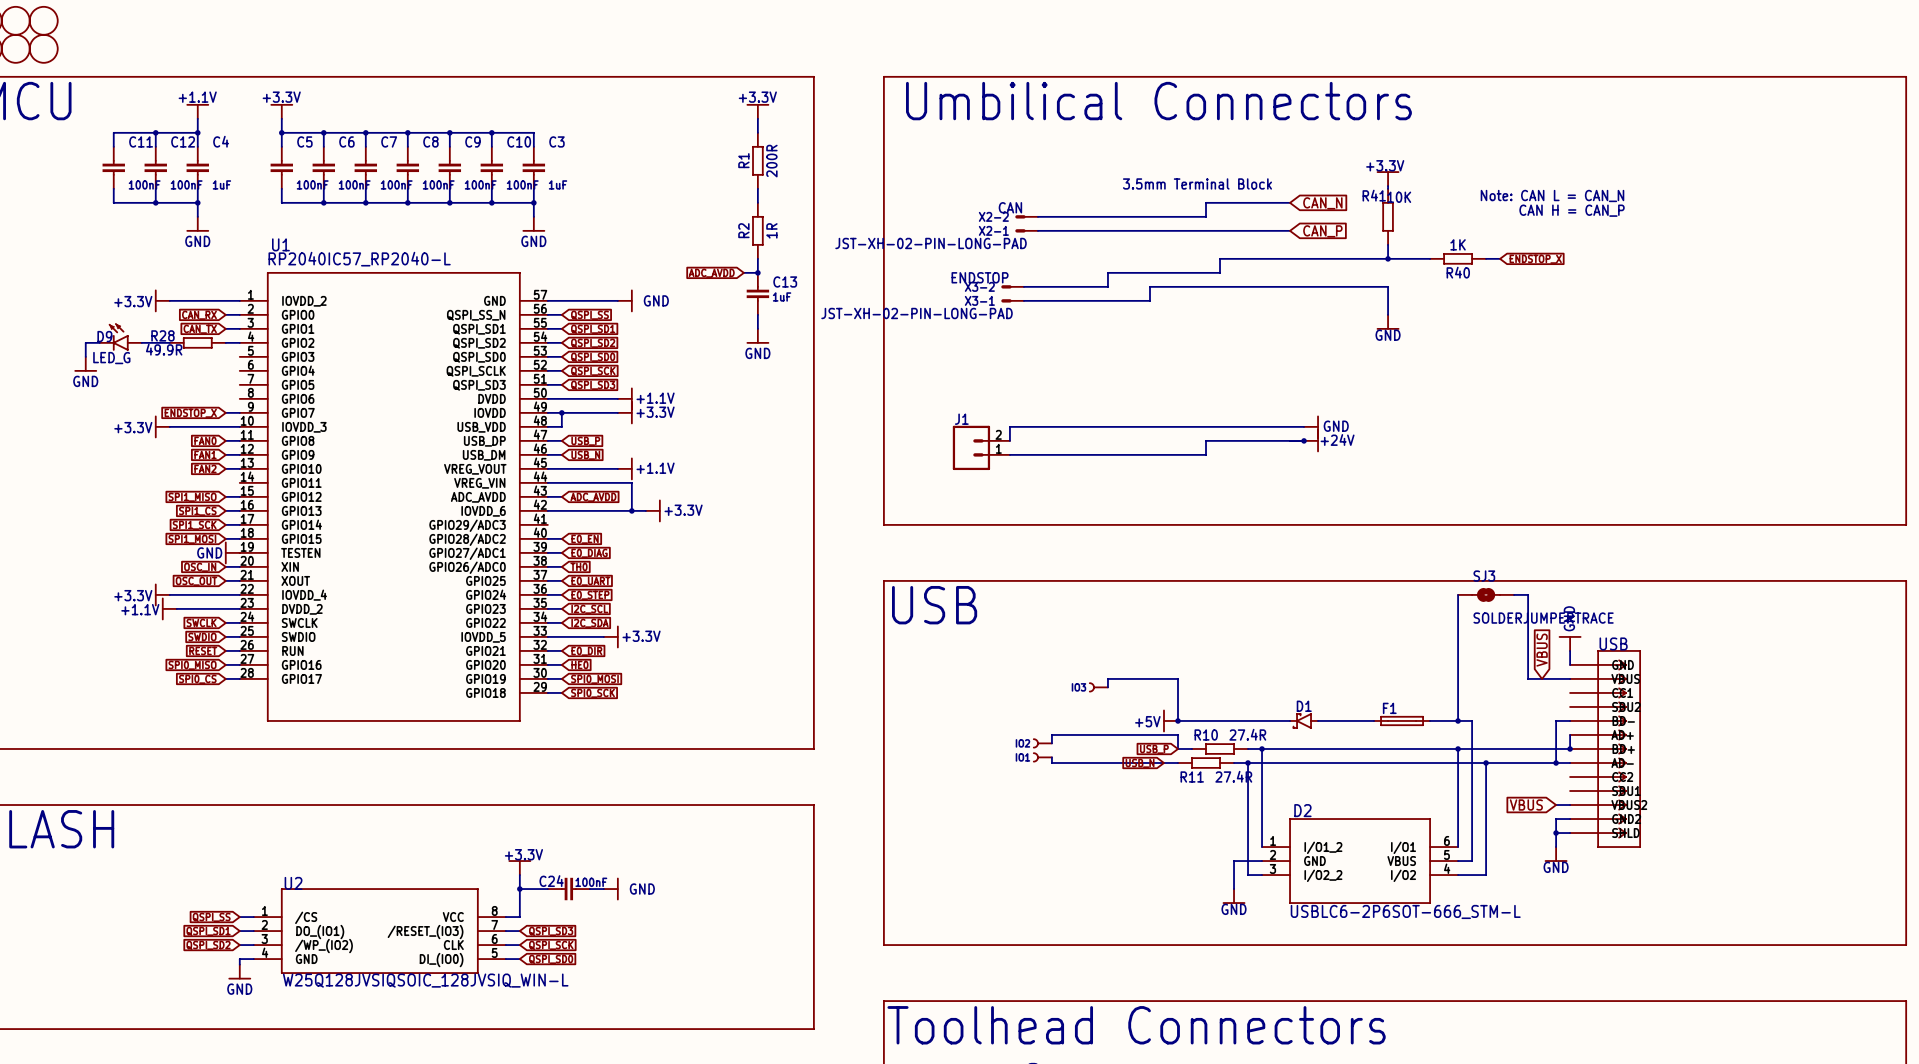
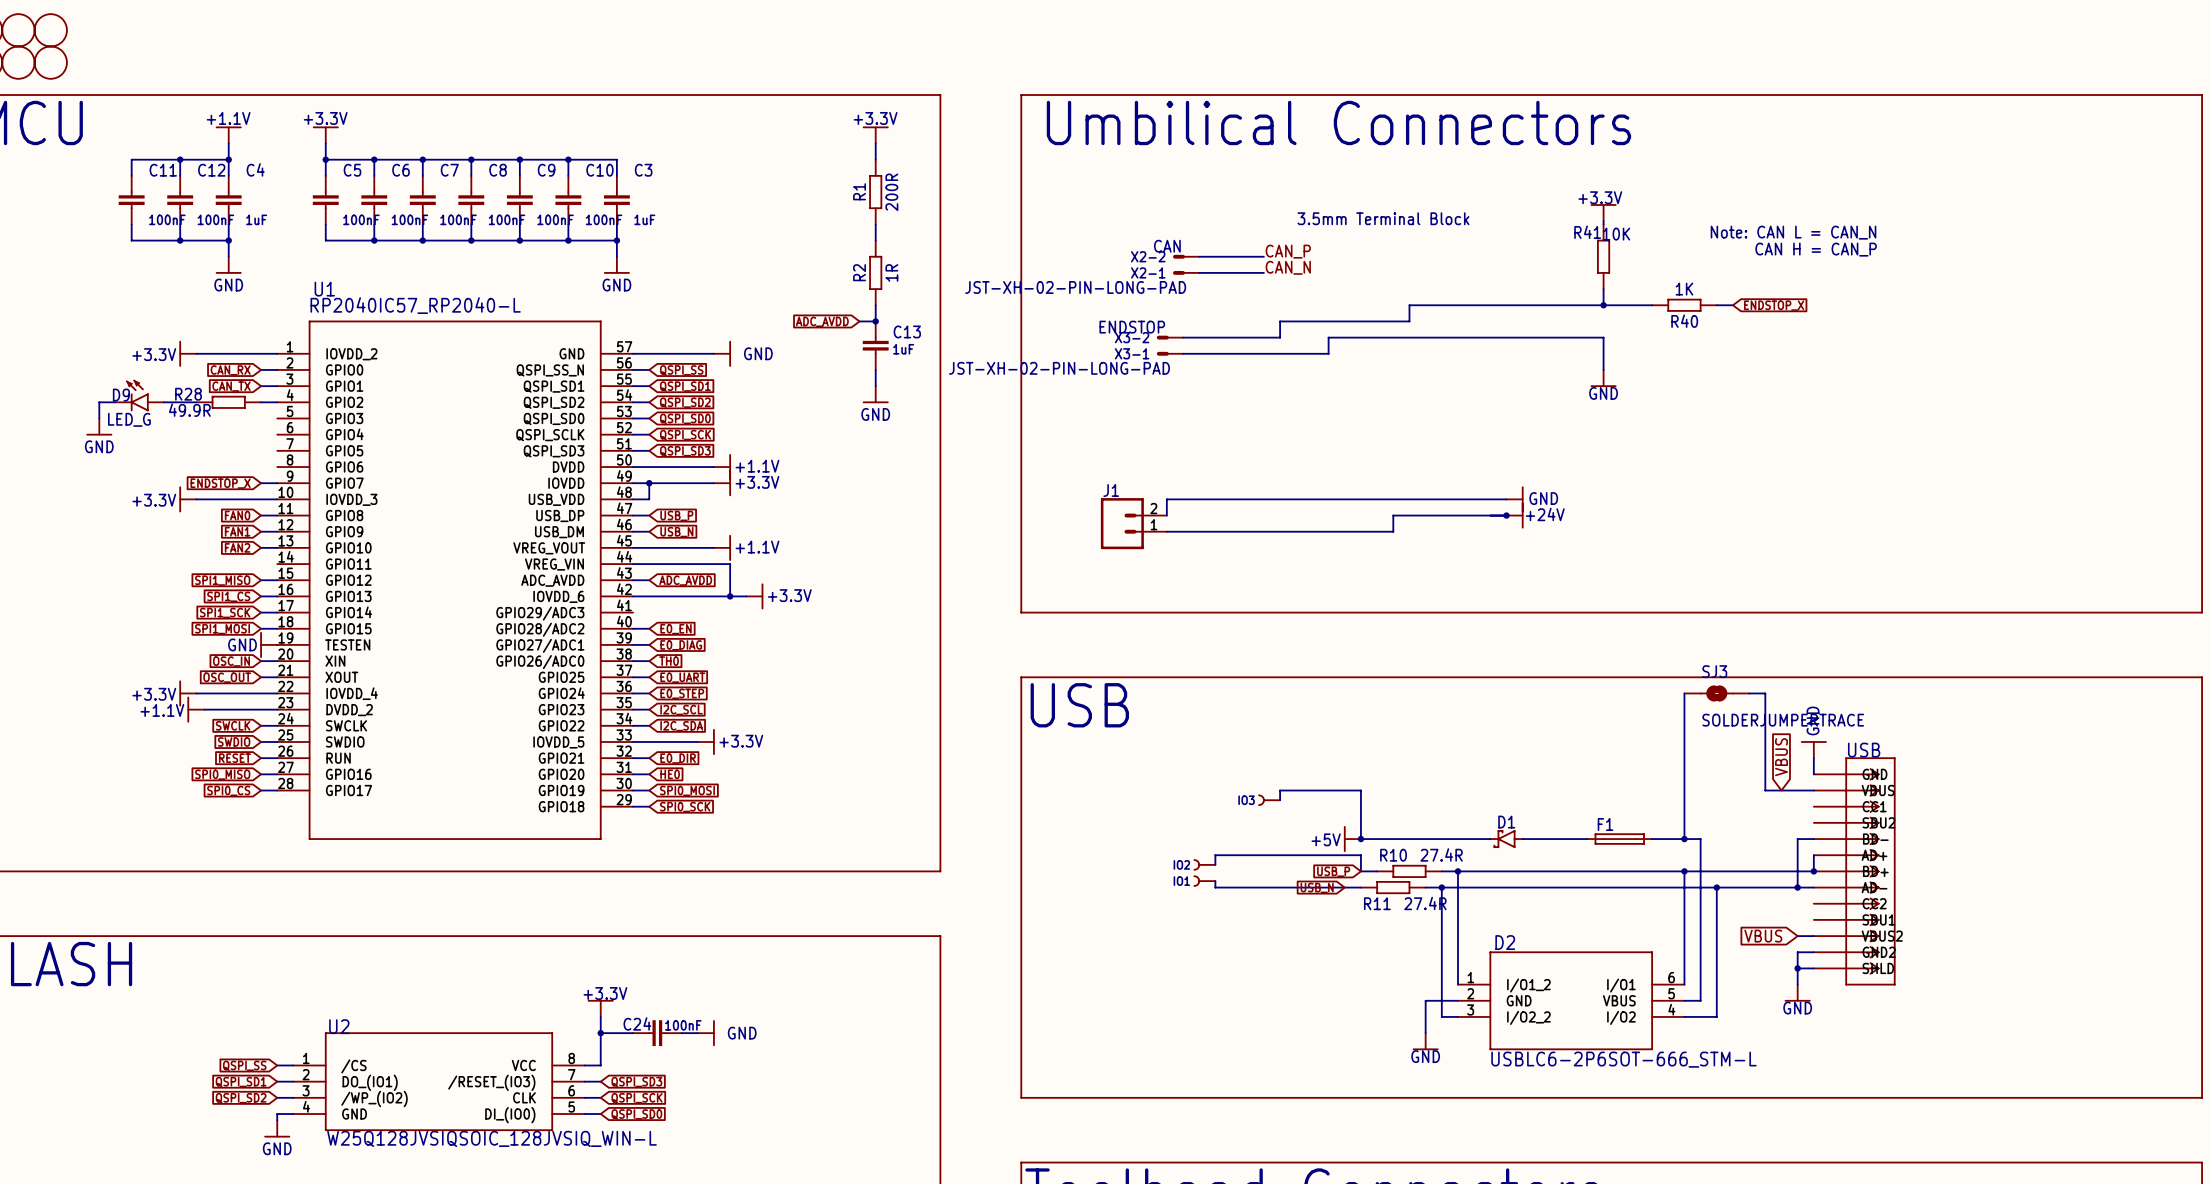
wire: (1290, 202) (1206, 202) (1206, 216) (1093, 216) -> none
global label: CAN_N (1322, 203) -> none
label: none -> CAN_P (1288, 251)
label: none -> CAN_N (1288, 267)
wire: (1093, 230) (1290, 230) -> none
global label: CAN_P (1322, 231) -> none

